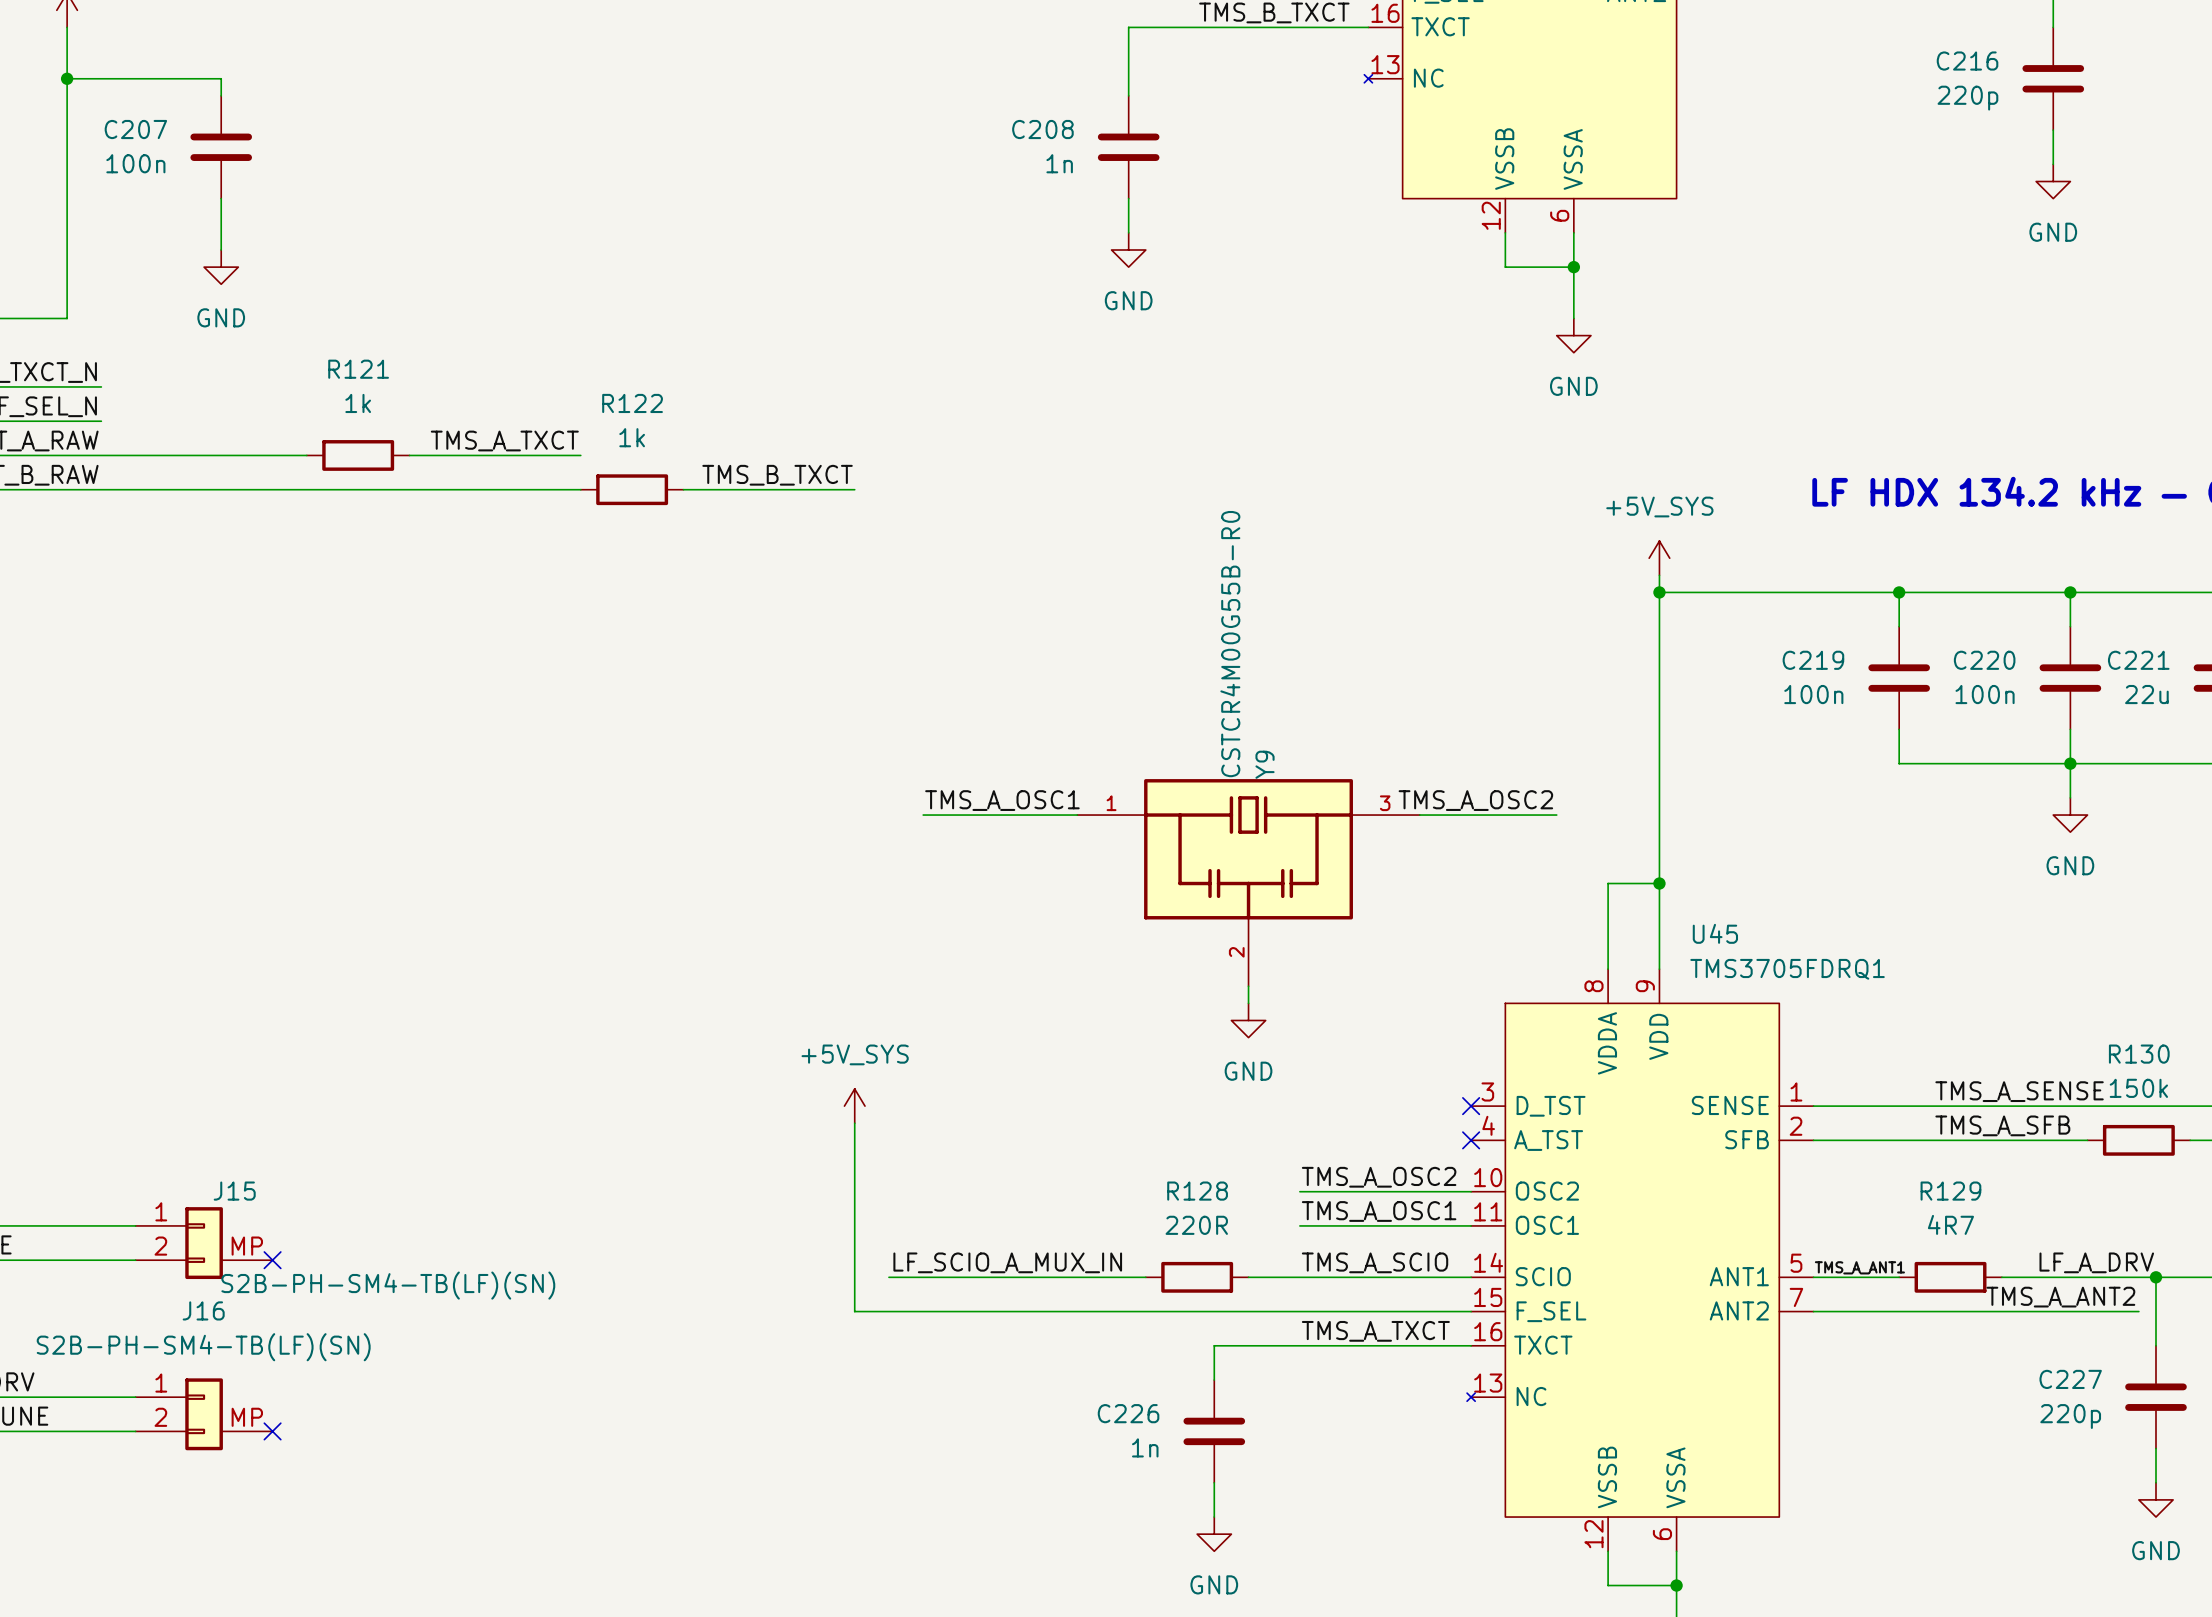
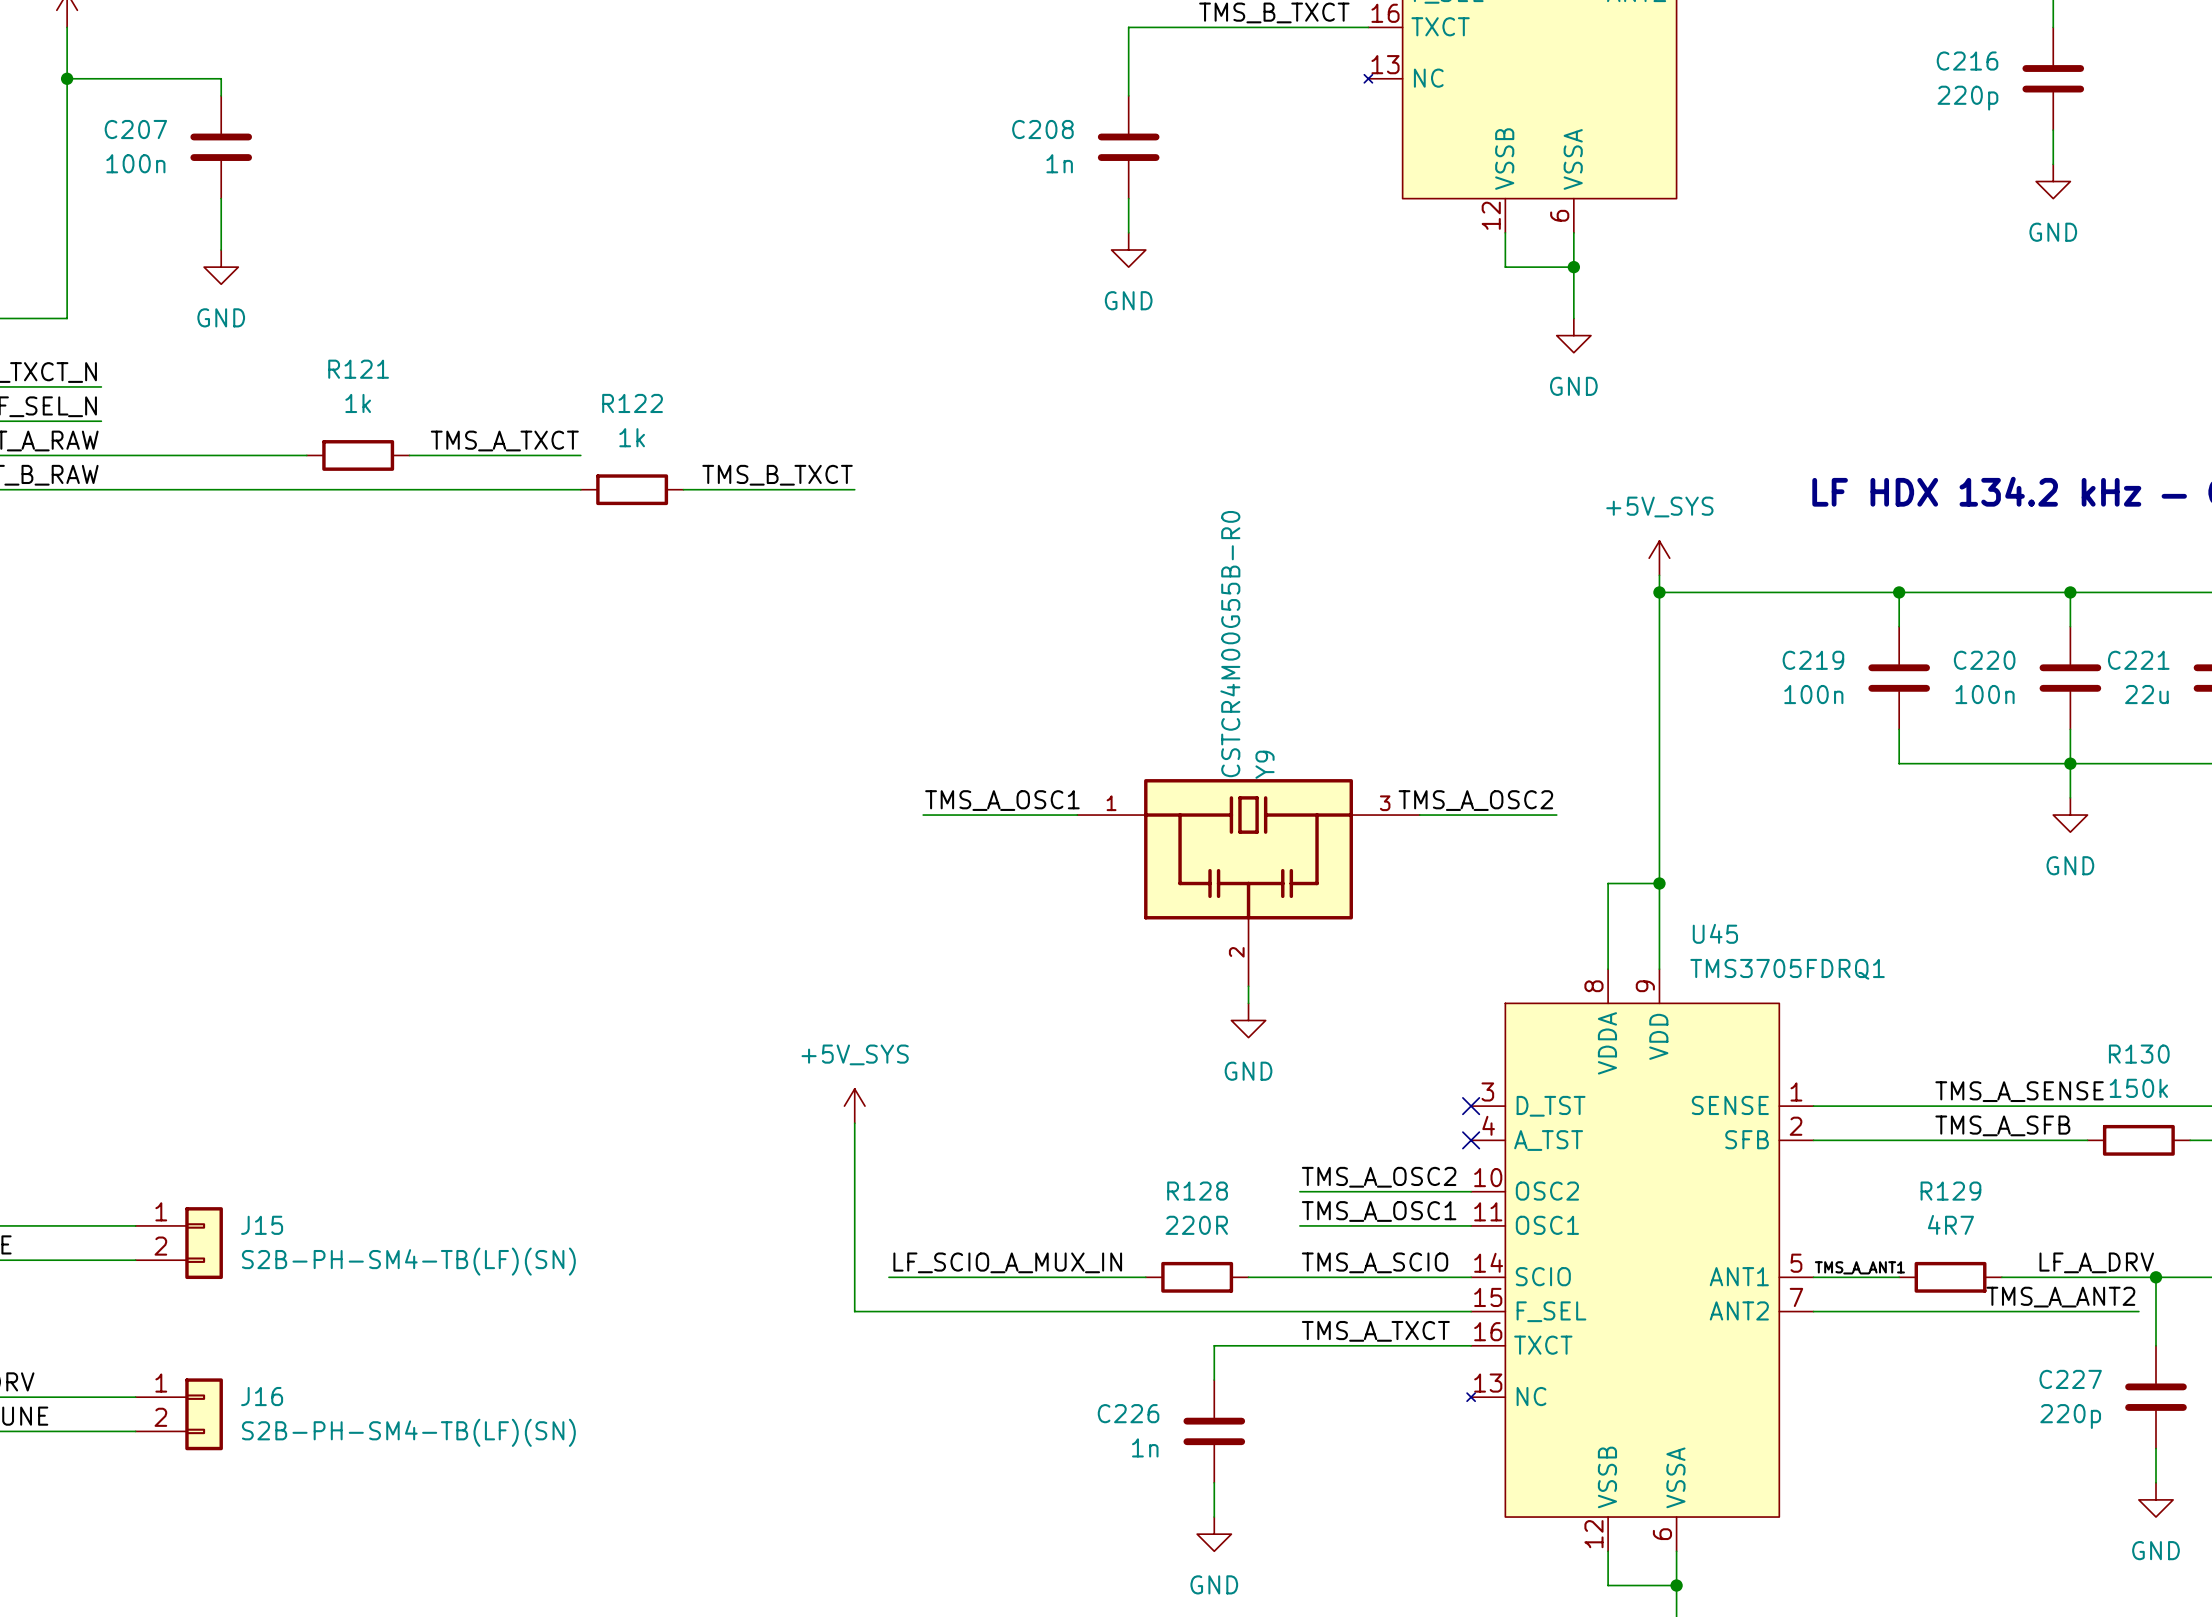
J15 name position: J15 (234, 1191) -> J15 (262, 1225)
J15 symbol: [135, 1207, 273, 1280] -> [135, 1207, 223, 1280]
no-connect mark: (272, 1260) -> none
J15 value position: S2B-PH-SM4-TB(LF)(SN) (388, 1285) -> S2B-PH-SM4-TB(LF)(SN) (408, 1261)
J16 name position: J16 (203, 1310) -> J16 (262, 1396)
J16 value position: S2B-PH-SM4-TB(LF)(SN) (203, 1347) -> S2B-PH-SM4-TB(LF)(SN) (408, 1432)
J16 symbol: [135, 1378, 273, 1451] -> [135, 1378, 223, 1451]
no-connect mark: (272, 1431) -> none

